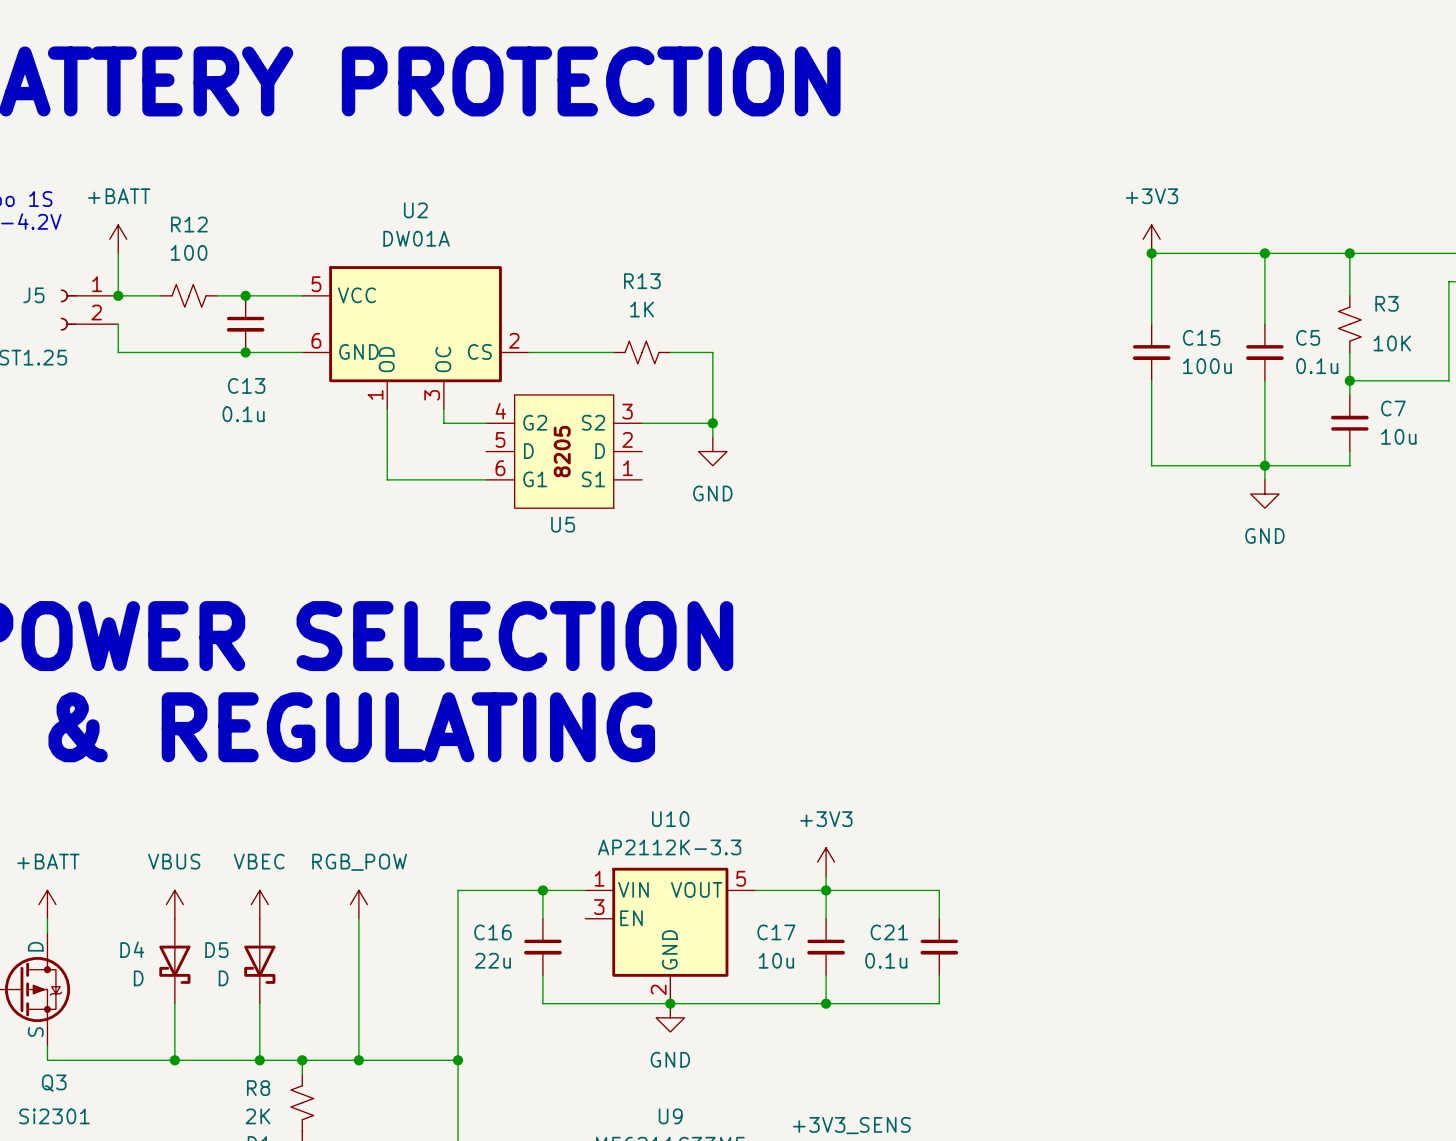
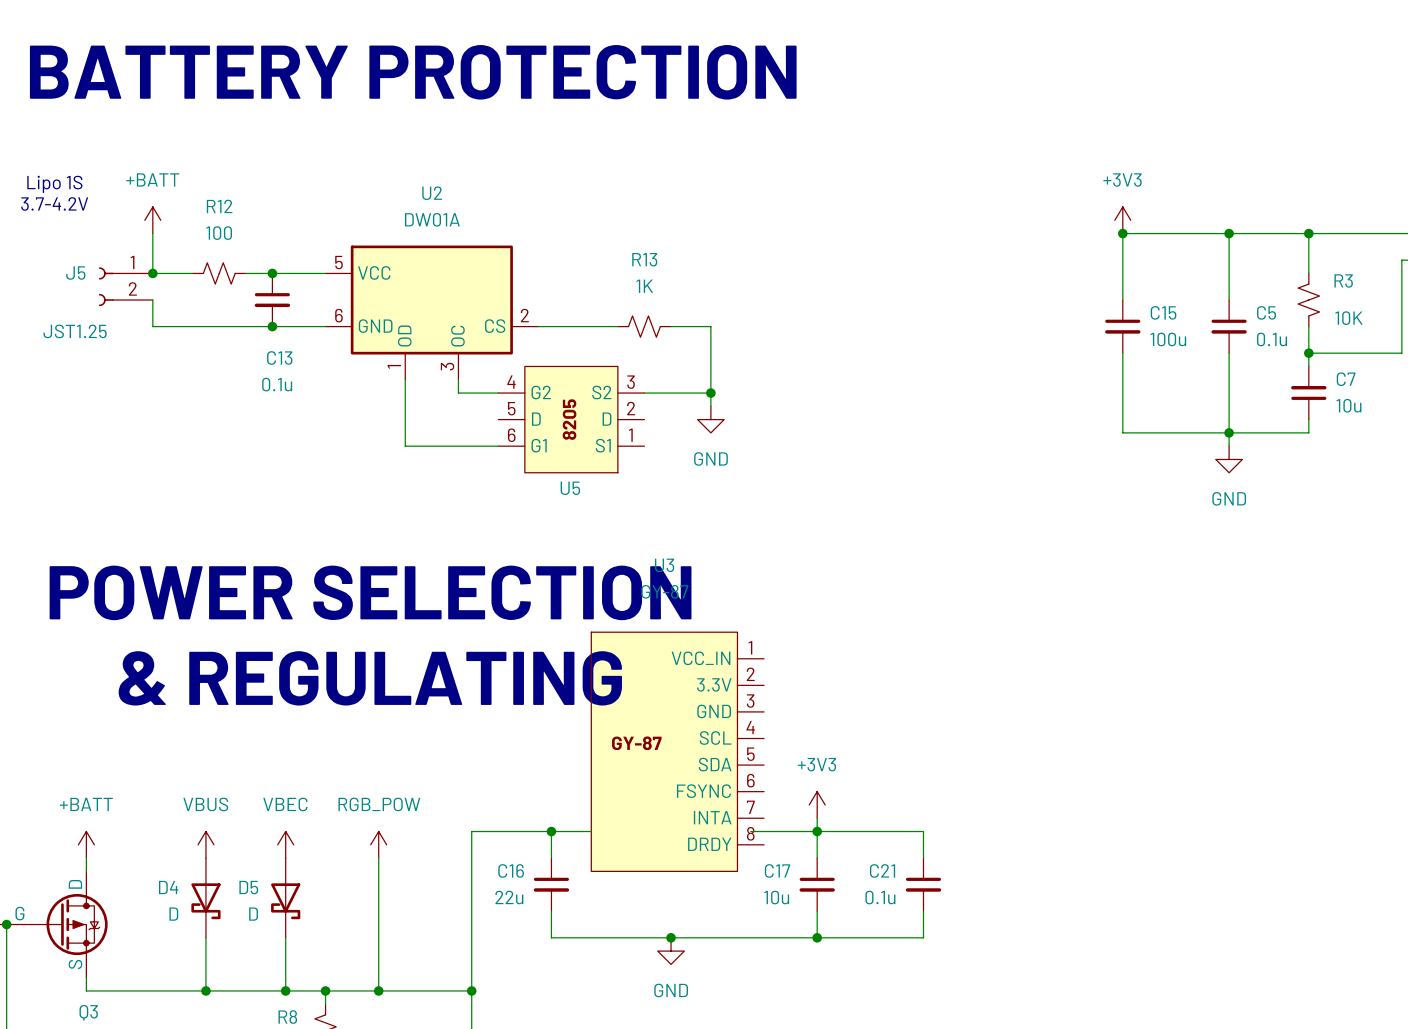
U3: none -> GY-87 (677, 751)
U10: AP2112K-3.3 (670, 935) -> none

